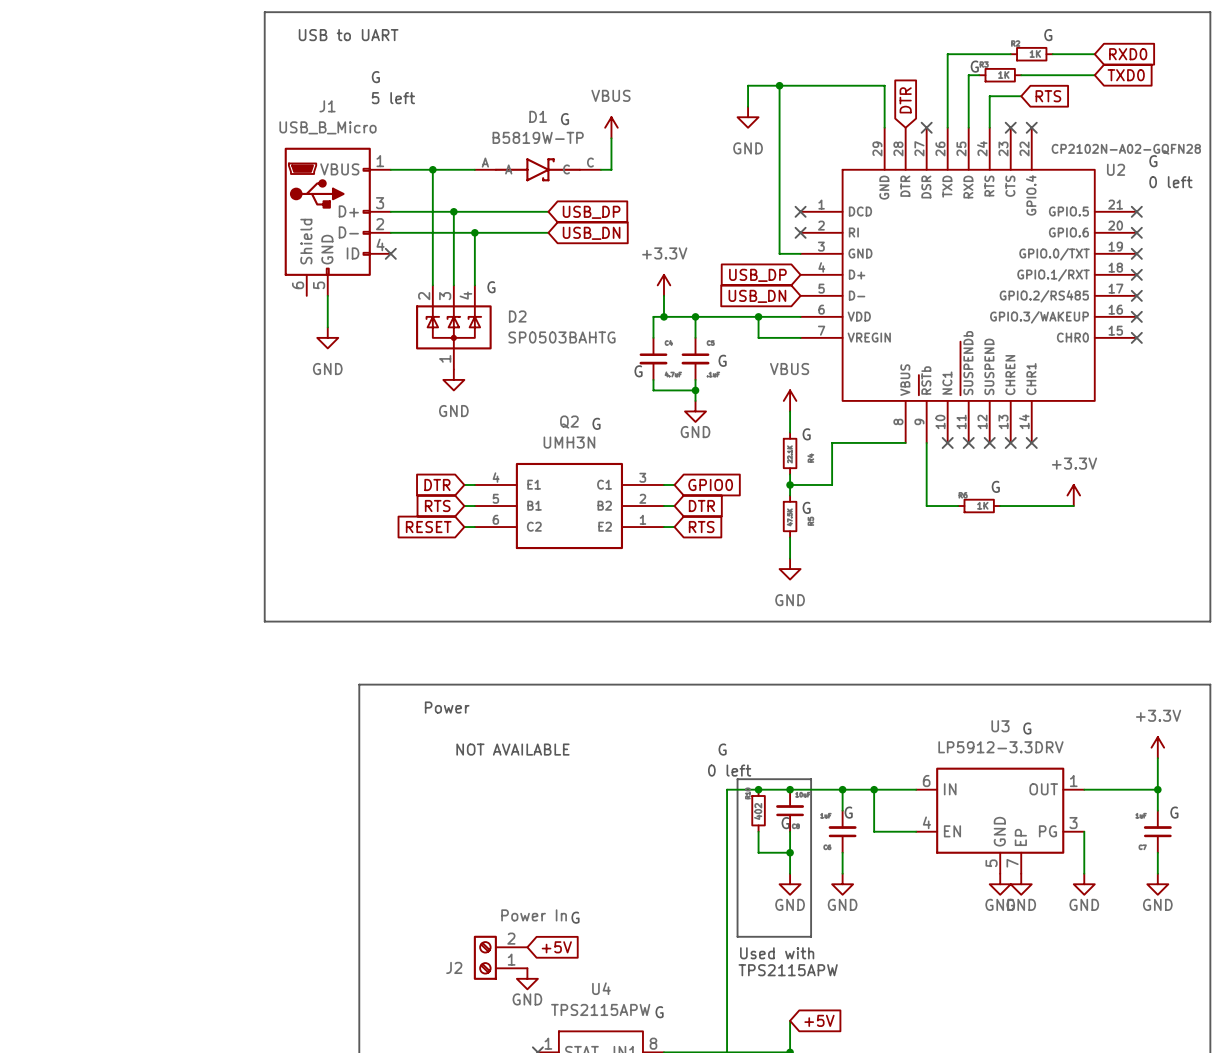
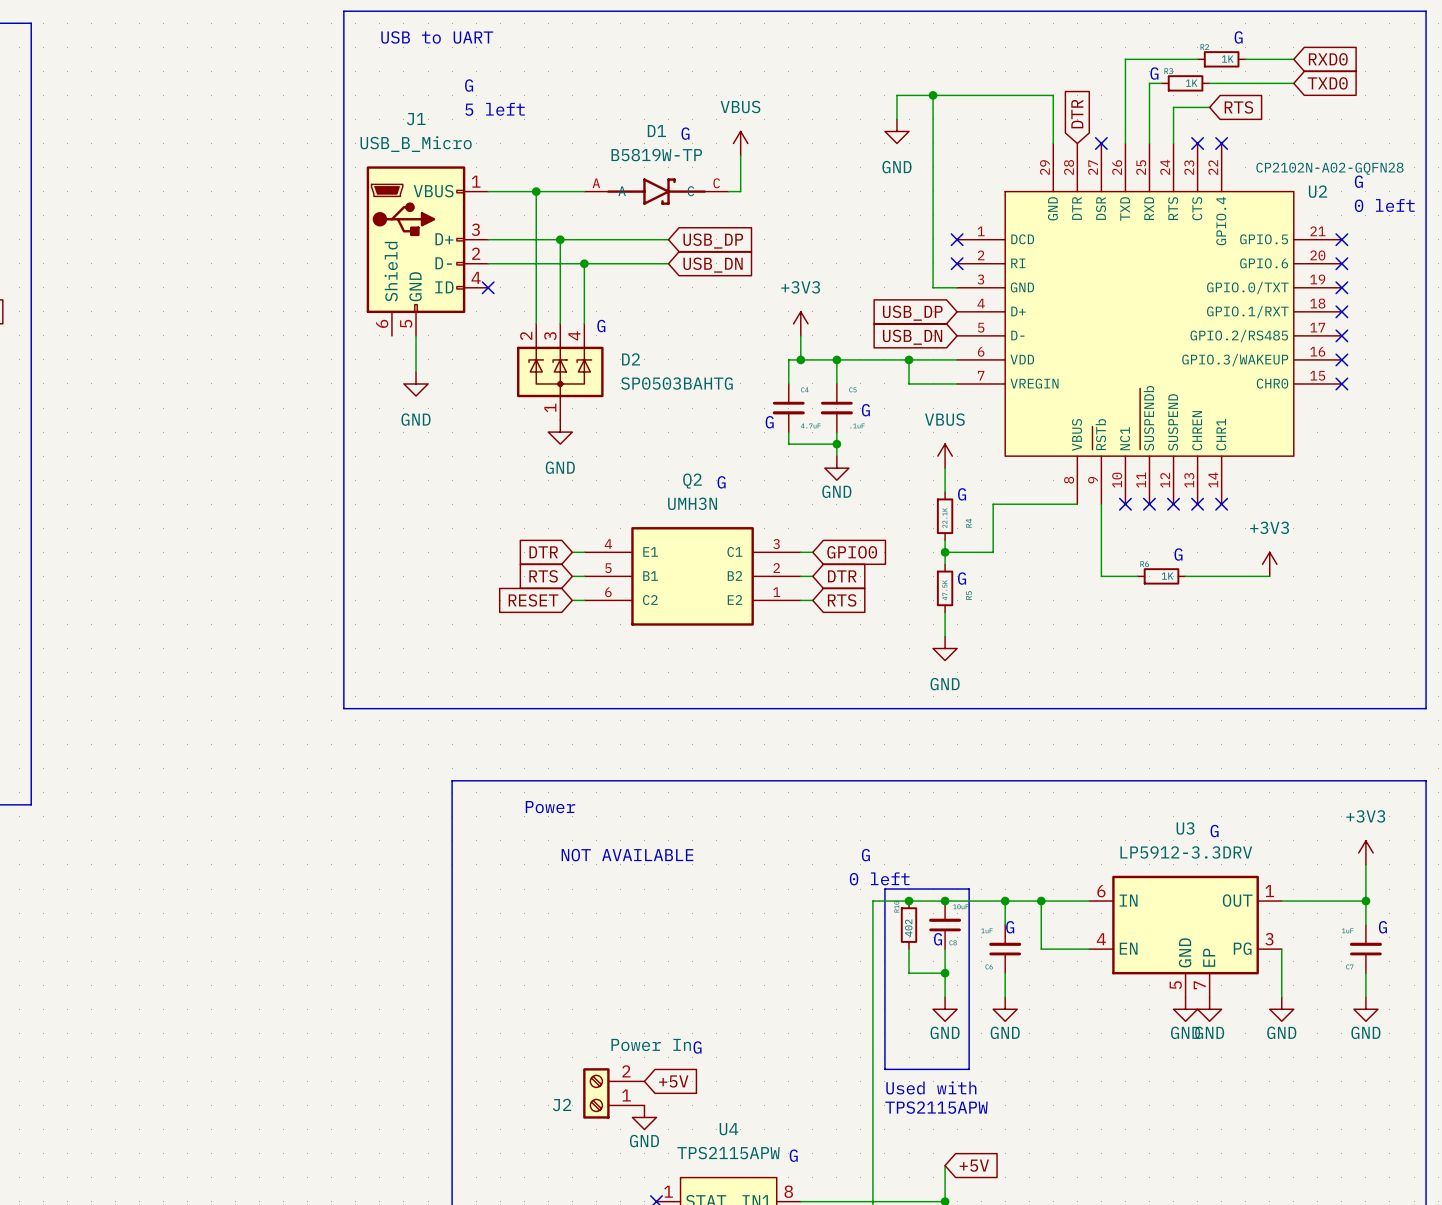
power symbol: +3.3V (663, 285) -> +3V3 (800, 323)
power symbol: +3.3V (1073, 495) -> +3V3 (1269, 564)
power symbol: +3.3V (1157, 747) -> +3V3 (1365, 852)

